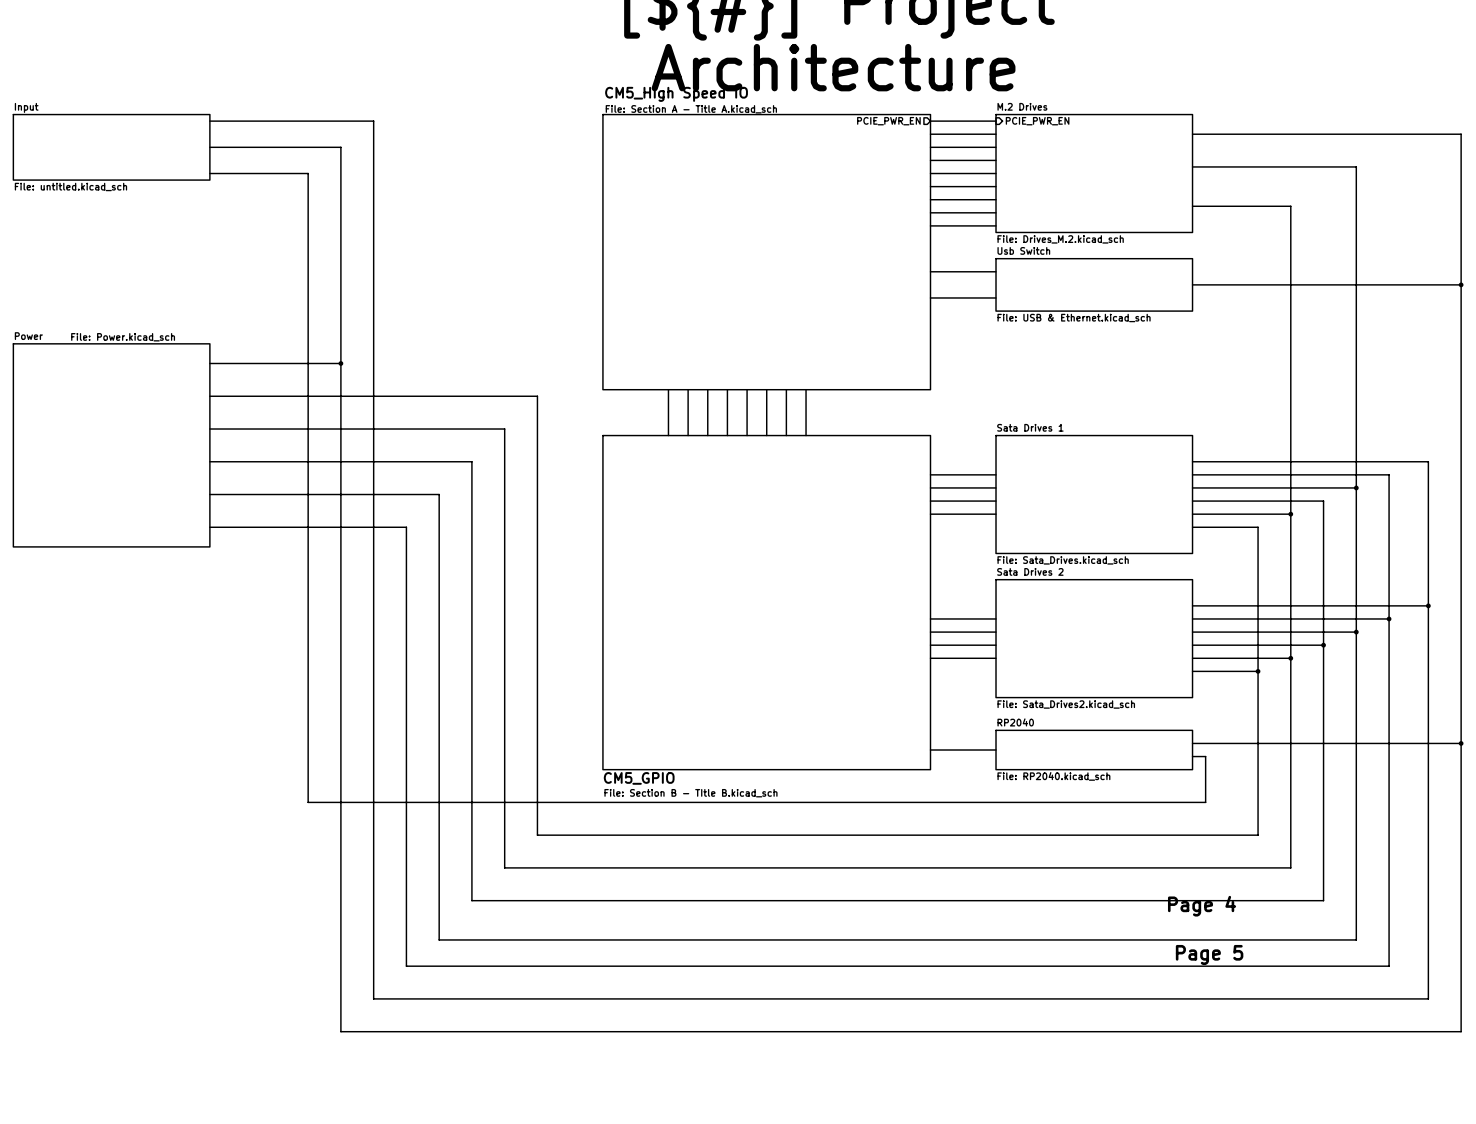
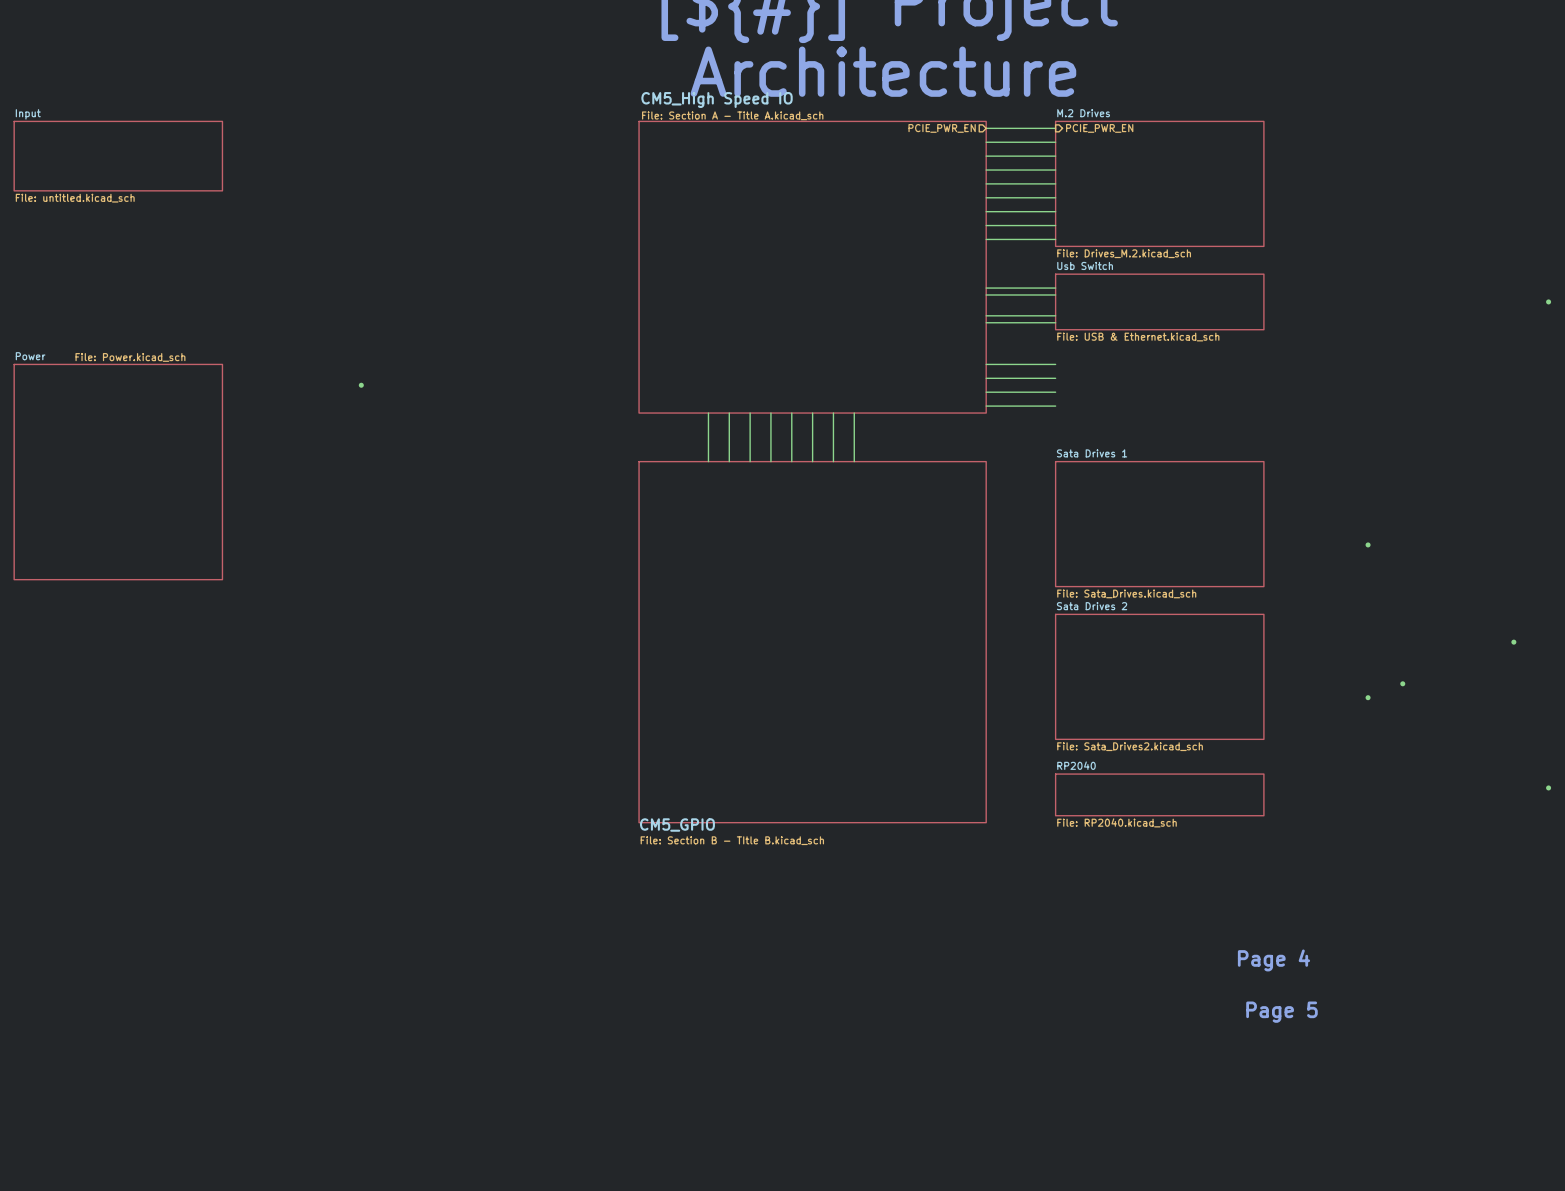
wire: (209, 121) (373, 121) (373, 998) (1428, 998) (1428, 461) (1192, 461) -> none
wire: (1192, 134) (1461, 134) (1461, 1031) (340, 1031) (340, 147) (209, 147) -> none
wire: (1192, 166) (1356, 166) (1356, 939) (439, 939) (439, 494) (209, 494) -> none
wire: (209, 173) (308, 173) (308, 802) (1205, 802) (1205, 756) (1192, 756) -> none
wire: (1192, 206) (1290, 206) (1290, 867) (504, 867) (504, 429) (209, 429) -> none
wire: none -> (986, 294) (1055, 294)
wire: (1192, 284) (1461, 284) -> none
wire: none -> (986, 322) (1055, 322)
wire: none -> (986, 364) (1055, 364)
wire: (209, 363) (340, 363) -> none
wire: (209, 396) (537, 396) (537, 835) (1258, 835) (1258, 527) (1192, 527) -> none
sheet CM5_GPIO shape: [602, 435, 931, 771] -> [638, 461, 987, 824]
wire: (209, 461) (471, 461) (471, 900) (1323, 900) (1323, 501) (1192, 501) -> none
wire: (930, 474) (996, 474) -> (986, 378) (1055, 378)
wire: (1192, 474) (1389, 474) (1389, 966) (406, 966) (406, 527) (209, 527) -> none
wire: (930, 487) (996, 487) -> (986, 392) (1055, 392)
wire: (1192, 487) (1356, 487) -> none
junction: (1356, 487) -> none
wire: (930, 501) (996, 501) -> (986, 406) (1055, 406)
wire: (930, 514) (996, 514) -> none
wire: (1192, 514) (1290, 514) -> none
wire: (1192, 605) (1428, 605) -> none
wire: (930, 618) (996, 618) -> none
wire: (1192, 618) (1389, 618) -> none
junction: (1389, 618) -> none
wire: (930, 632) (996, 632) -> none
wire: (1192, 632) (1356, 632) -> none
junction: (1356, 632) -> none
wire: (930, 645) (996, 645) -> none
wire: (1192, 645) (1323, 645) -> none
wire: (930, 658) (996, 658) -> none
wire: (1192, 658) (1290, 658) -> none
wire: (1192, 671) (1258, 671) -> none
junction: (1258, 671) -> none
wire: (1192, 743) (1461, 743) -> none
wire: (930, 750) (996, 750) -> none

